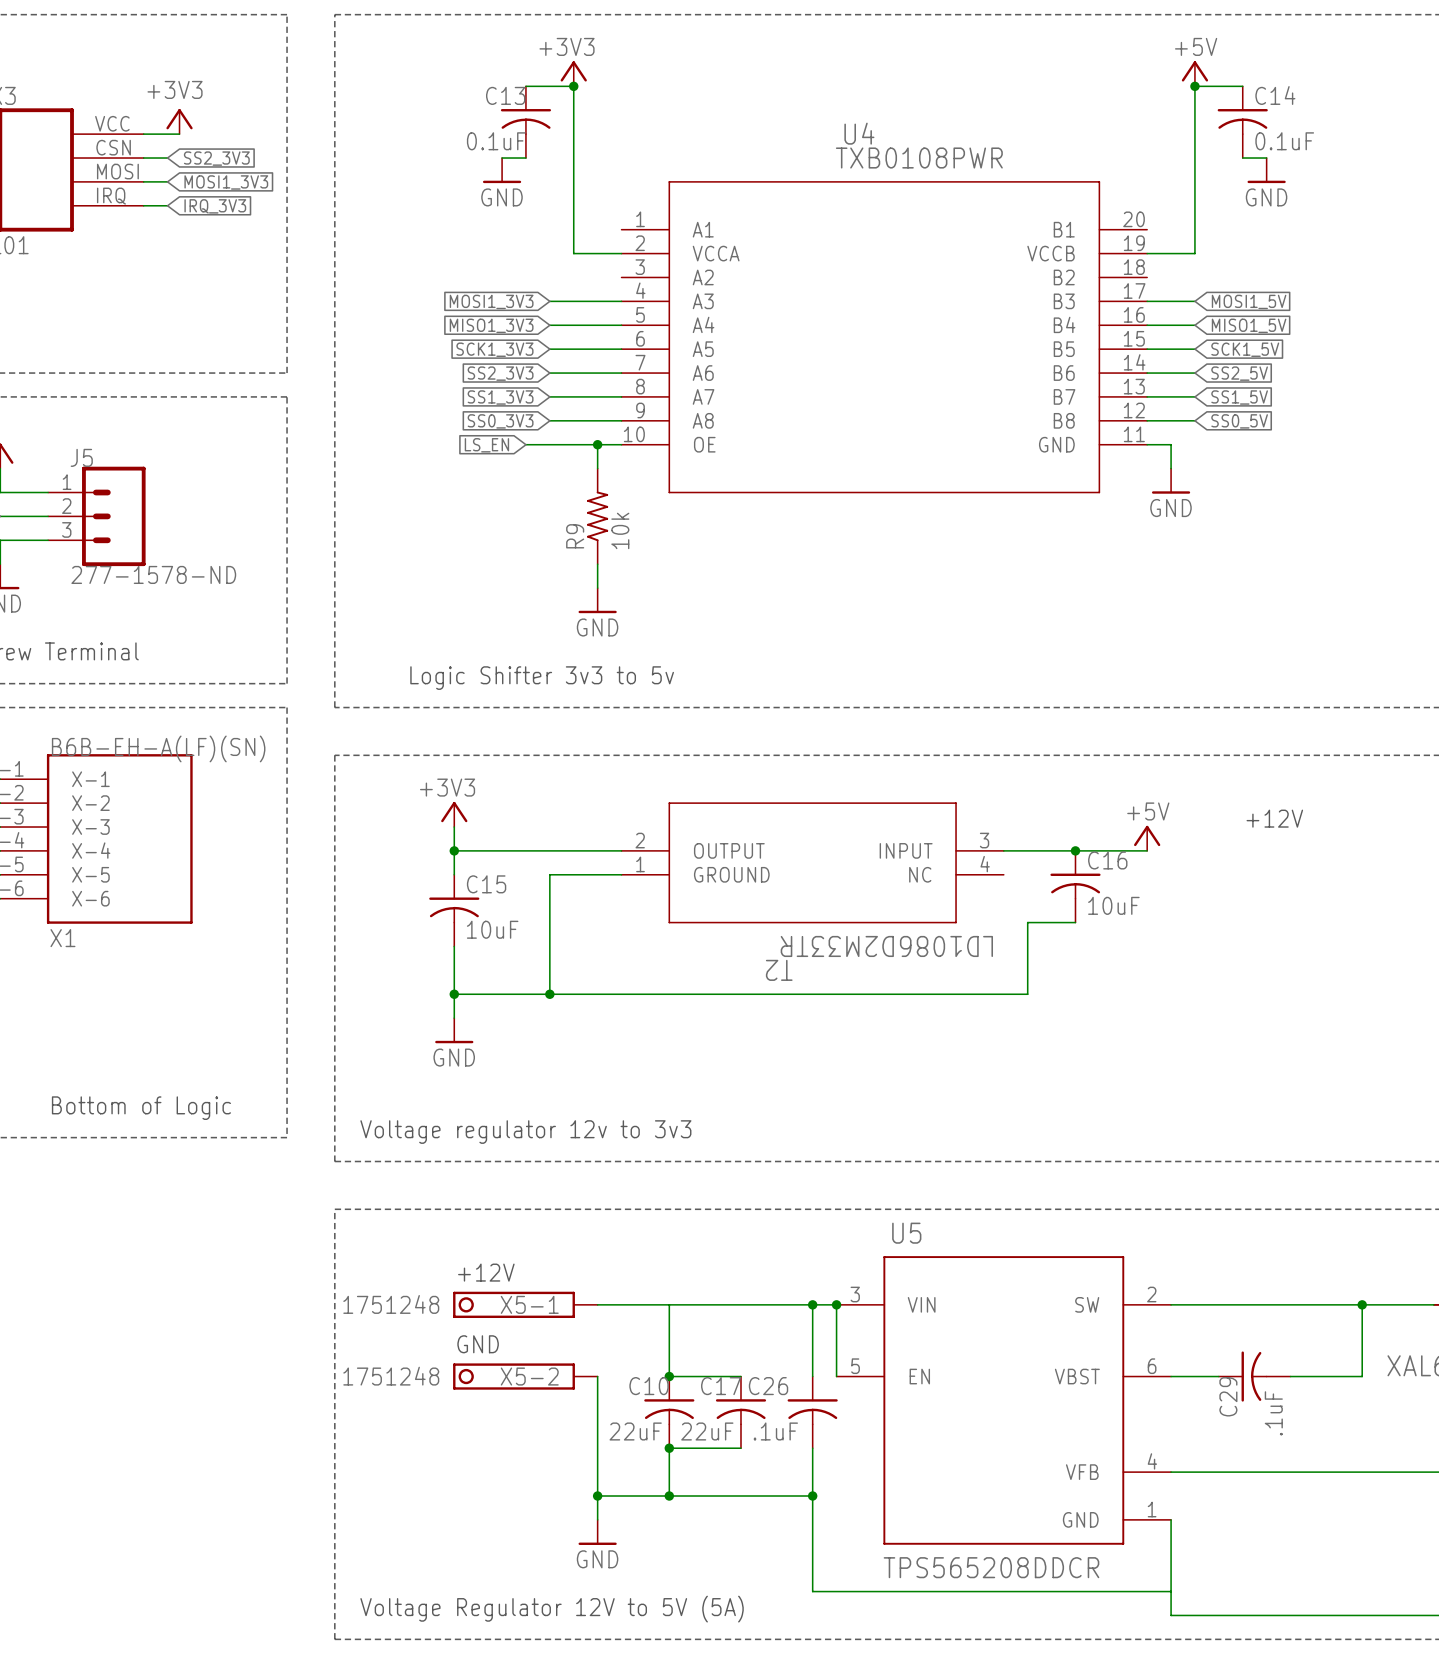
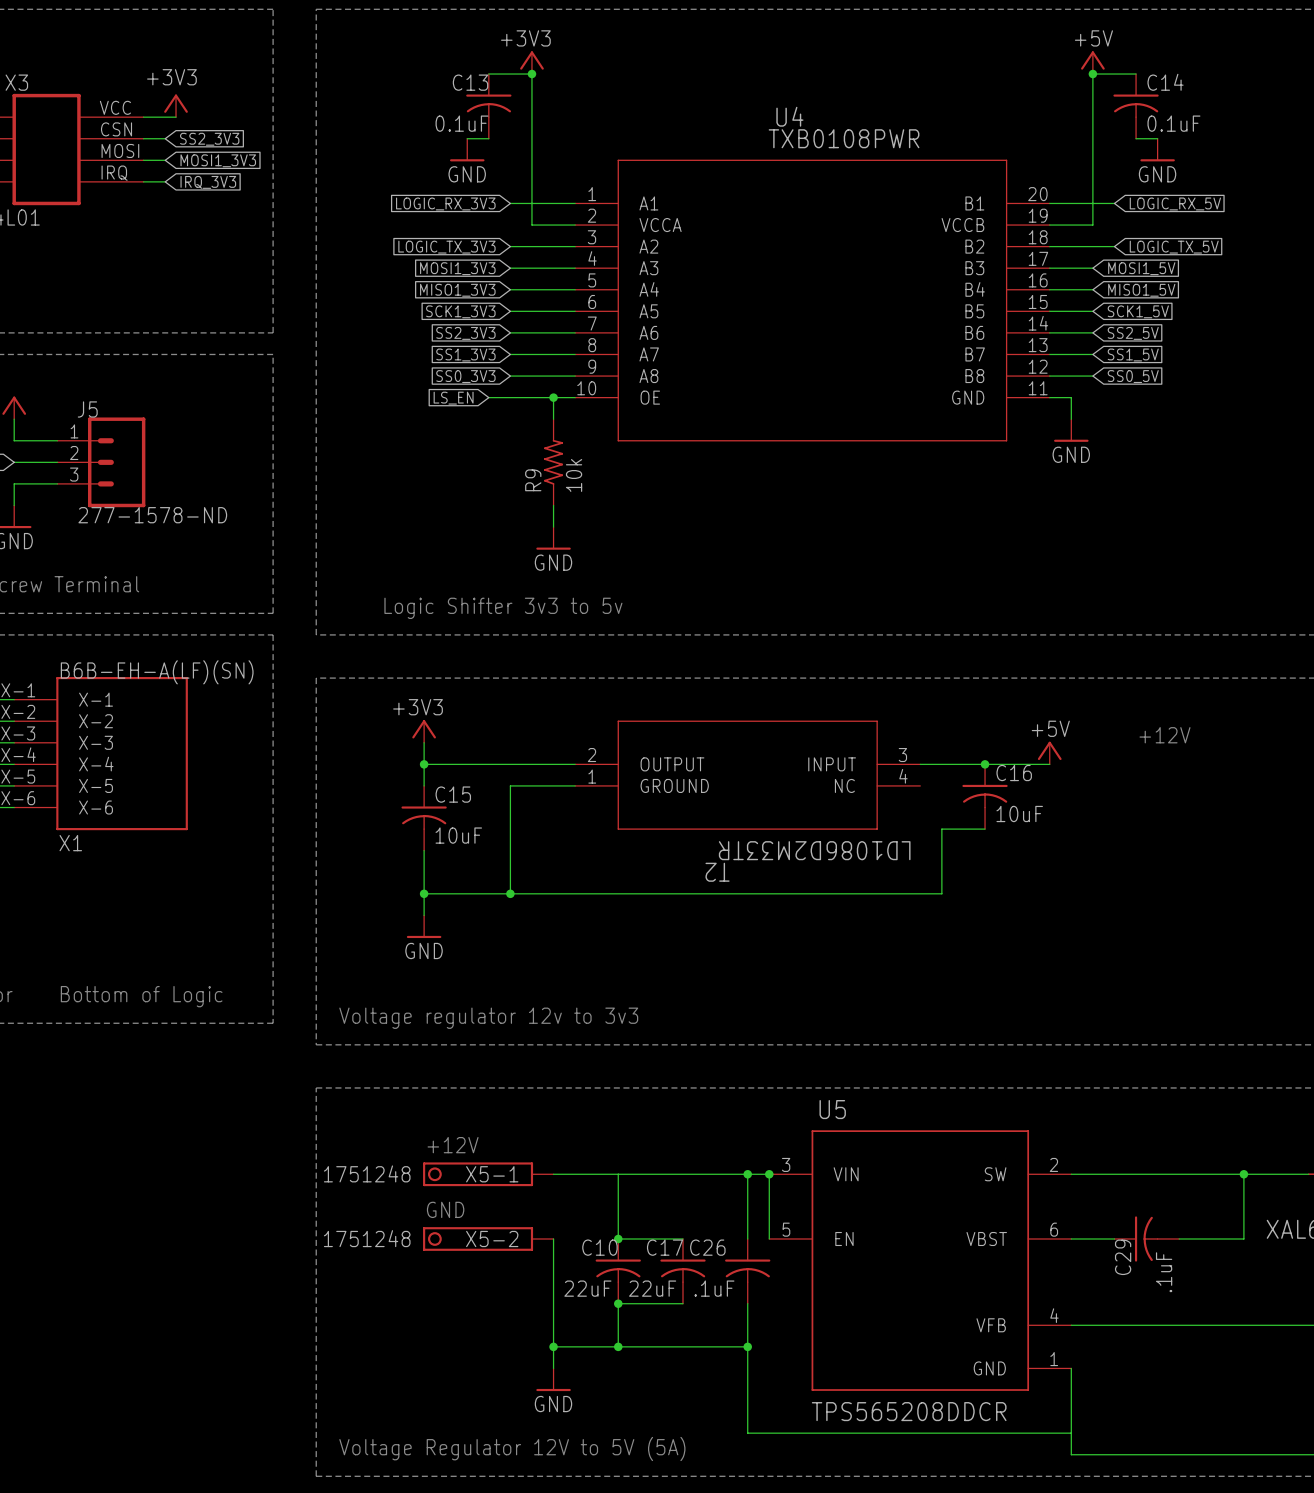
wire: none -> (510, 203) (575, 203)
wire: none -> (1049, 203) (1114, 203)
global label: none -> LOGIC_RX_3V3 (445, 203)
global label: none -> LOGIC_RX_5V (1175, 203)
wire: none -> (510, 246) (575, 246)
wire: none -> (1049, 246) (1114, 246)
global label: none -> LOGIC_TX_3V3 (446, 247)
global label: none -> LOGIC_TX_5V (1174, 247)

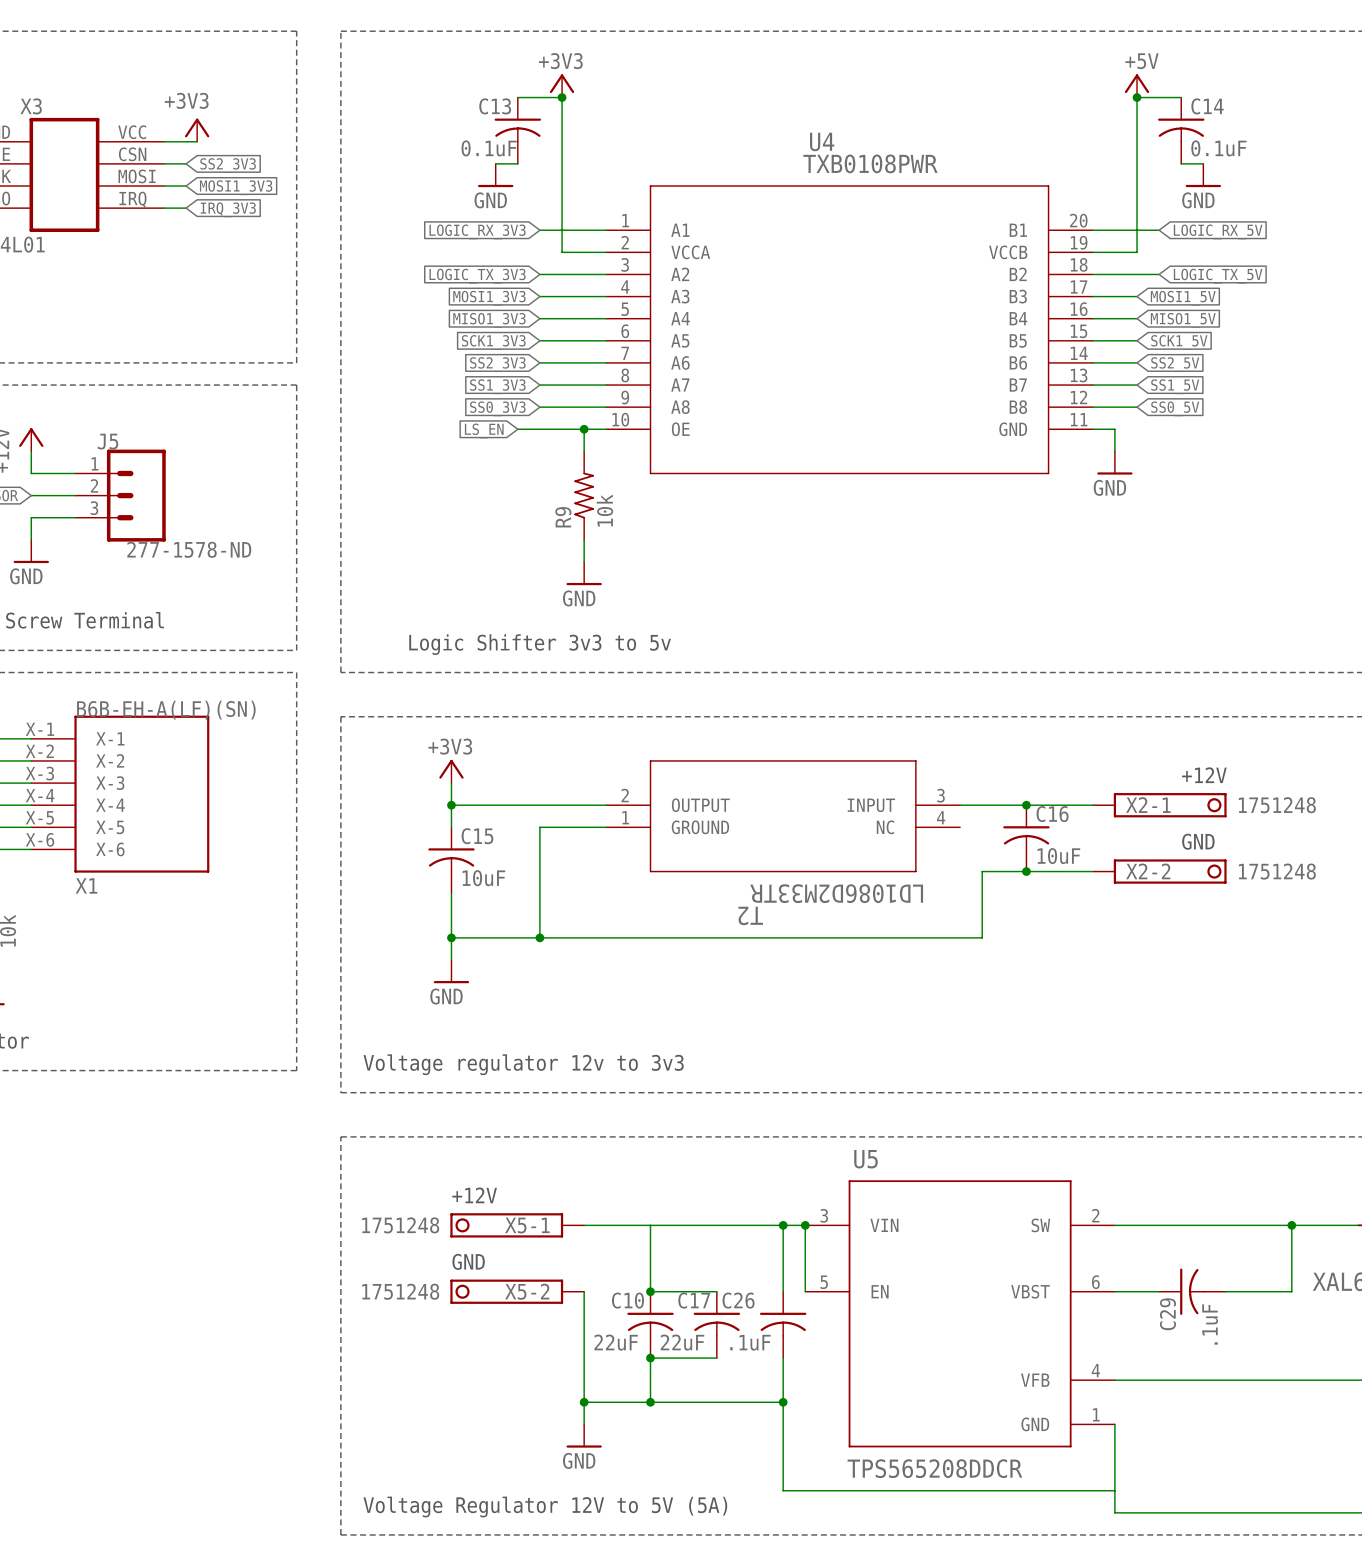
power symbol: +5V (1049, 753) -> none
X2-1: none -> 1751248 (1159, 805)
text: none -> GND (1198, 841)
wire: none -> (1026, 871) (1092, 871)
junction: none -> (1026, 871)
X2-2: none -> 1751248 (1159, 871)
text: Bottom of Logic (141, 996) -> none

